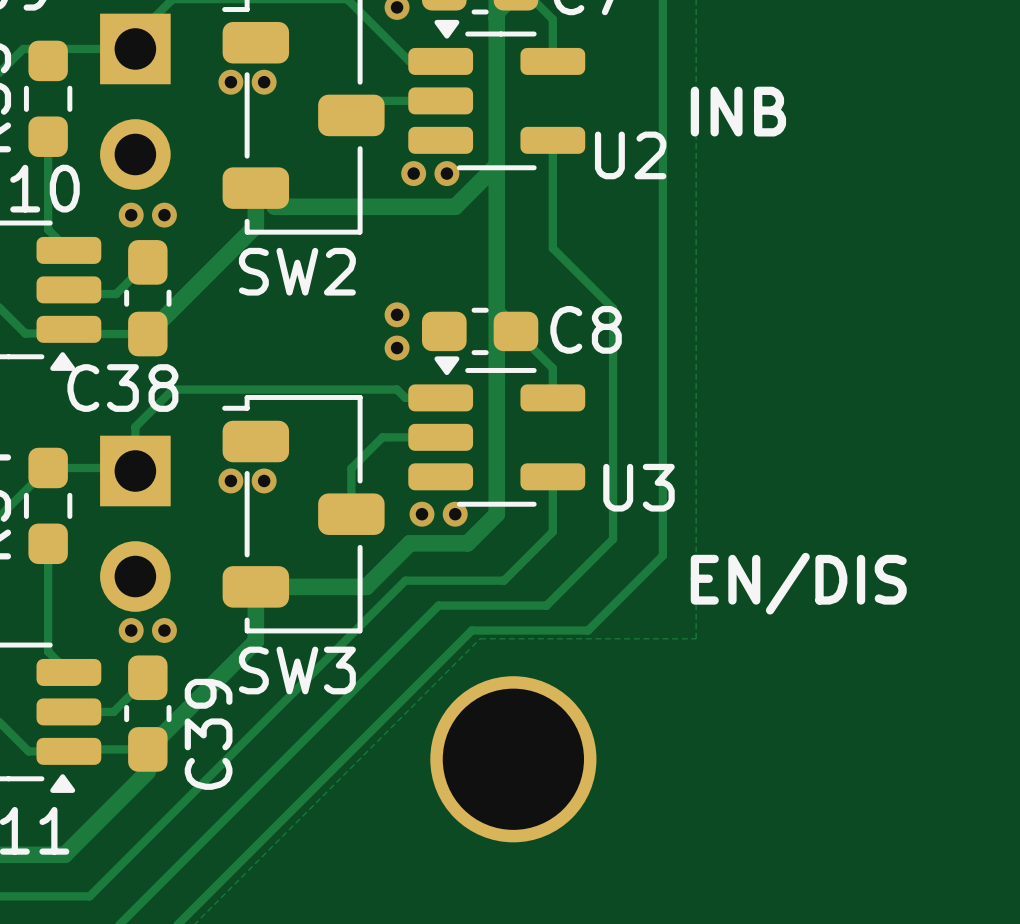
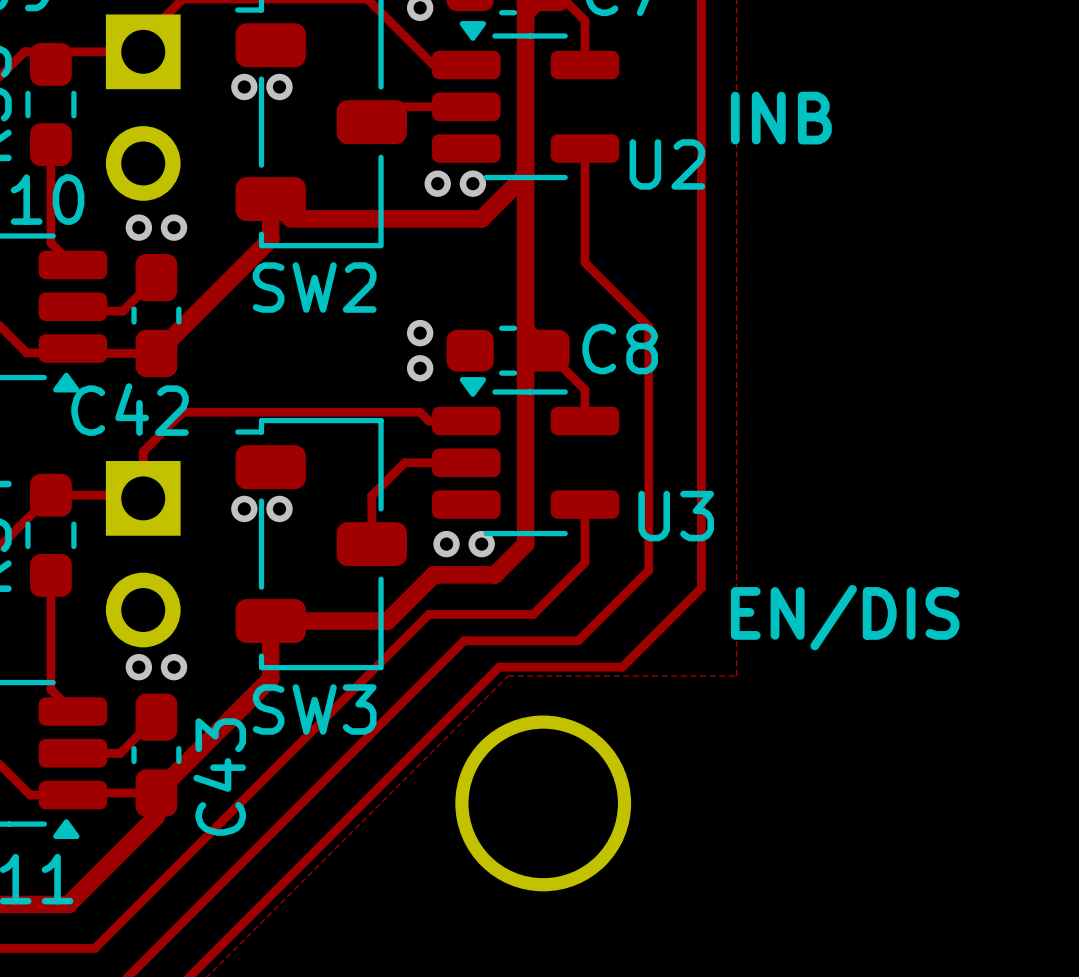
C38 name: C38 (122, 388) -> C42 (130, 409)
C39 name: C39 (208, 734) -> C43 (219, 777)

